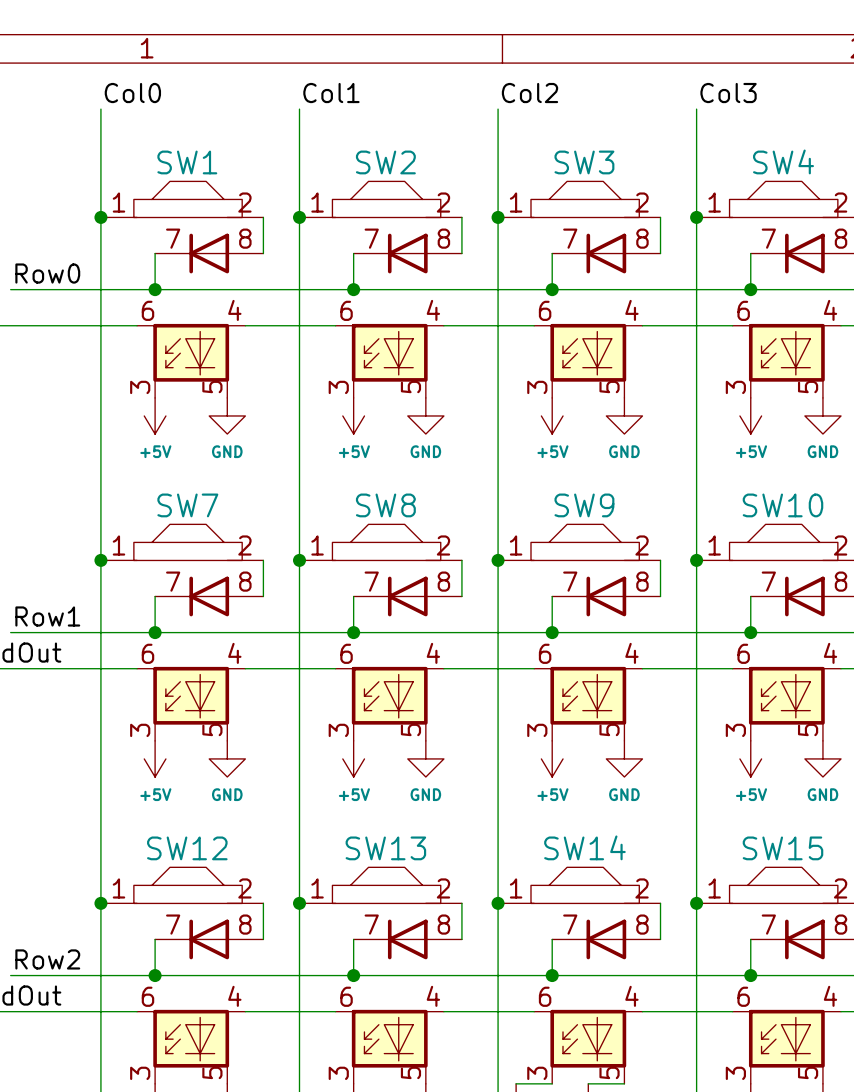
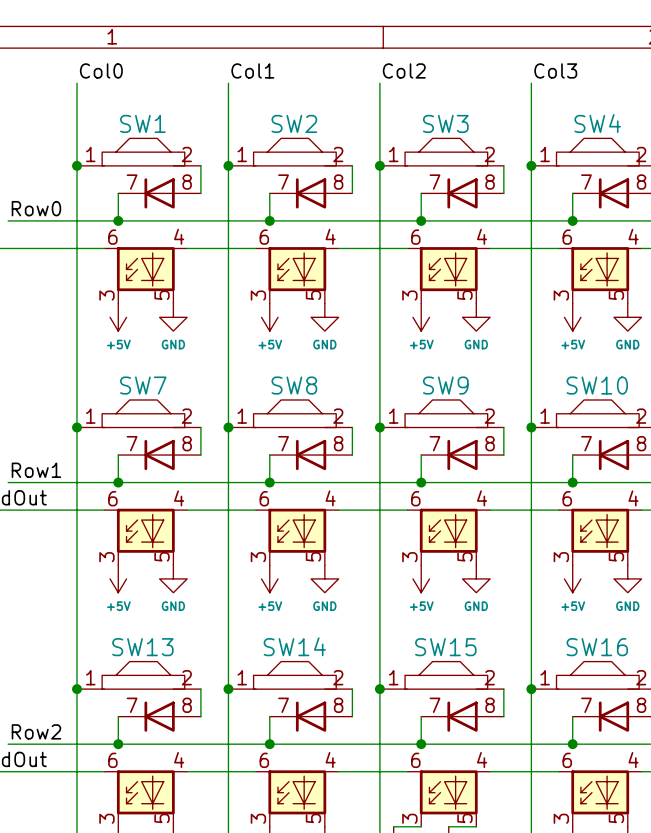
SW14 name: SW14 (584, 847) -> SW15 (445, 647)
SW12 name: SW12 (187, 848) -> SW13 (142, 647)
SW13 name: SW13 (385, 848) -> SW14 (294, 646)
SW15 name: SW15 (782, 848) -> SW16 (597, 647)

